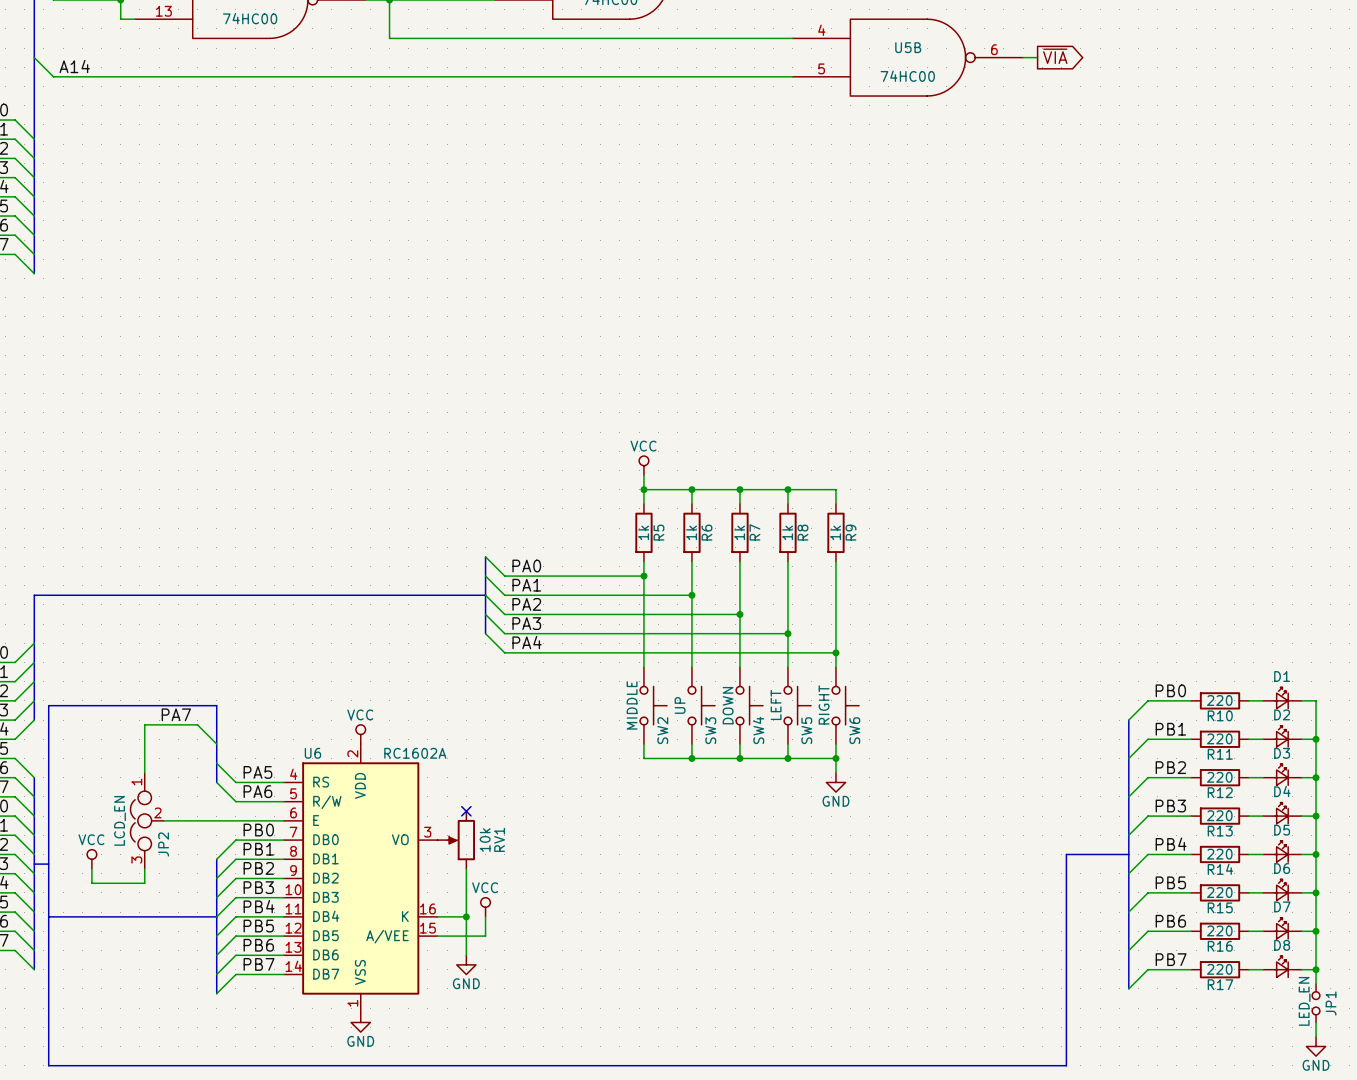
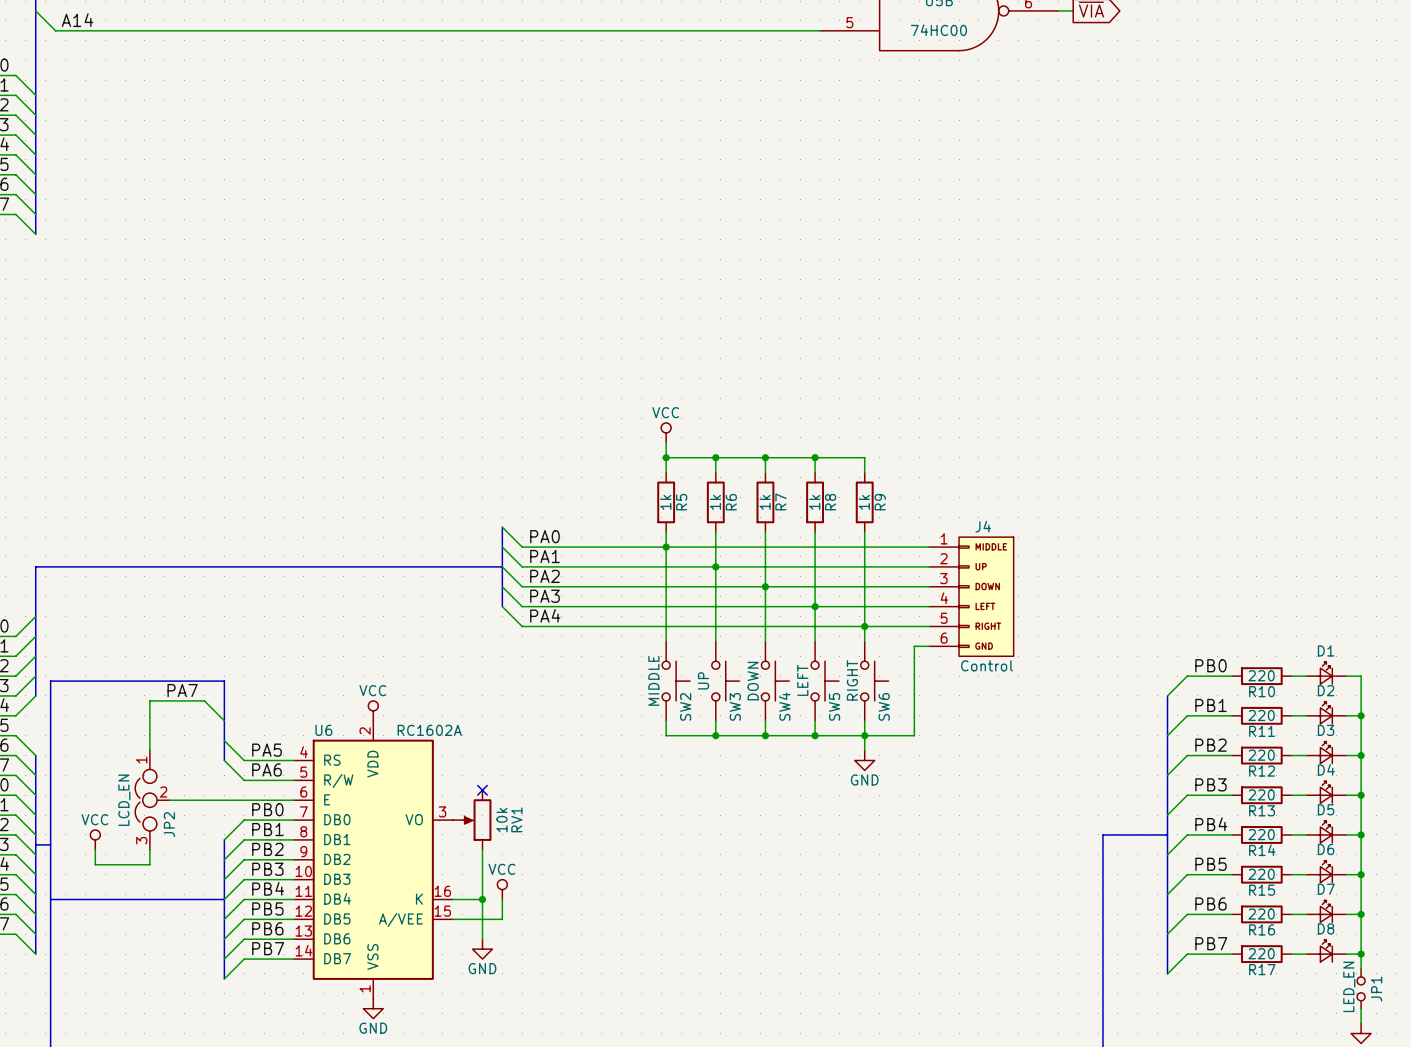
wire: none -> (666, 547) (929, 547)
wire: none -> (715, 566) (929, 566)
wire: none -> (765, 586) (929, 586)
J4: none -> Control (971, 596)
wire: none -> (815, 606) (929, 606)
wire: none -> (864, 626) (929, 626)
wire: none -> (929, 646) (914, 646) (914, 735) (864, 735)

